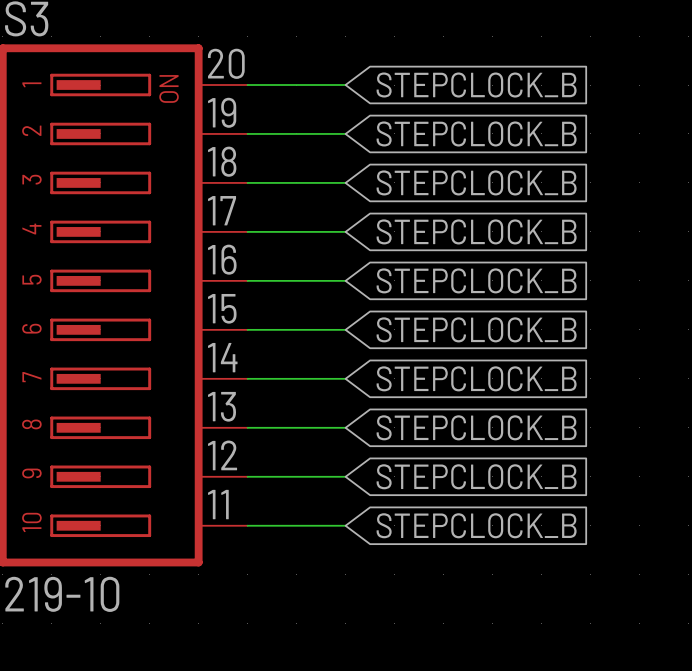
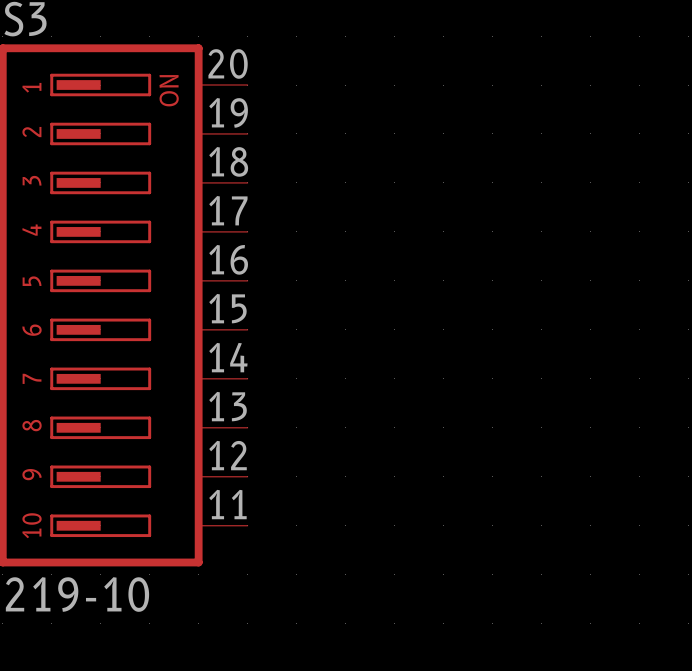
wire: (247, 85) (345, 85) -> none
global label: STEPCLOCK_B (476, 85) -> none
wire: (247, 133) (345, 133) -> none
global label: STEPCLOCK_B (476, 133) -> none
wire: (247, 182) (345, 182) -> none
global label: STEPCLOCK_B (476, 182) -> none
wire: (247, 231) (345, 231) -> none
global label: STEPCLOCK_B (476, 231) -> none
wire: (247, 280) (345, 280) -> none
global label: STEPCLOCK_B (476, 280) -> none
wire: (247, 329) (345, 329) -> none
global label: STEPCLOCK_B (476, 329) -> none
wire: (247, 378) (345, 378) -> none
global label: STEPCLOCK_B (476, 378) -> none
wire: (247, 427) (345, 427) -> none
global label: STEPCLOCK_B (476, 427) -> none
wire: (247, 476) (345, 476) -> none
global label: STEPCLOCK_B (476, 476) -> none
wire: (247, 525) (345, 525) -> none
global label: STEPCLOCK_B (476, 525) -> none

